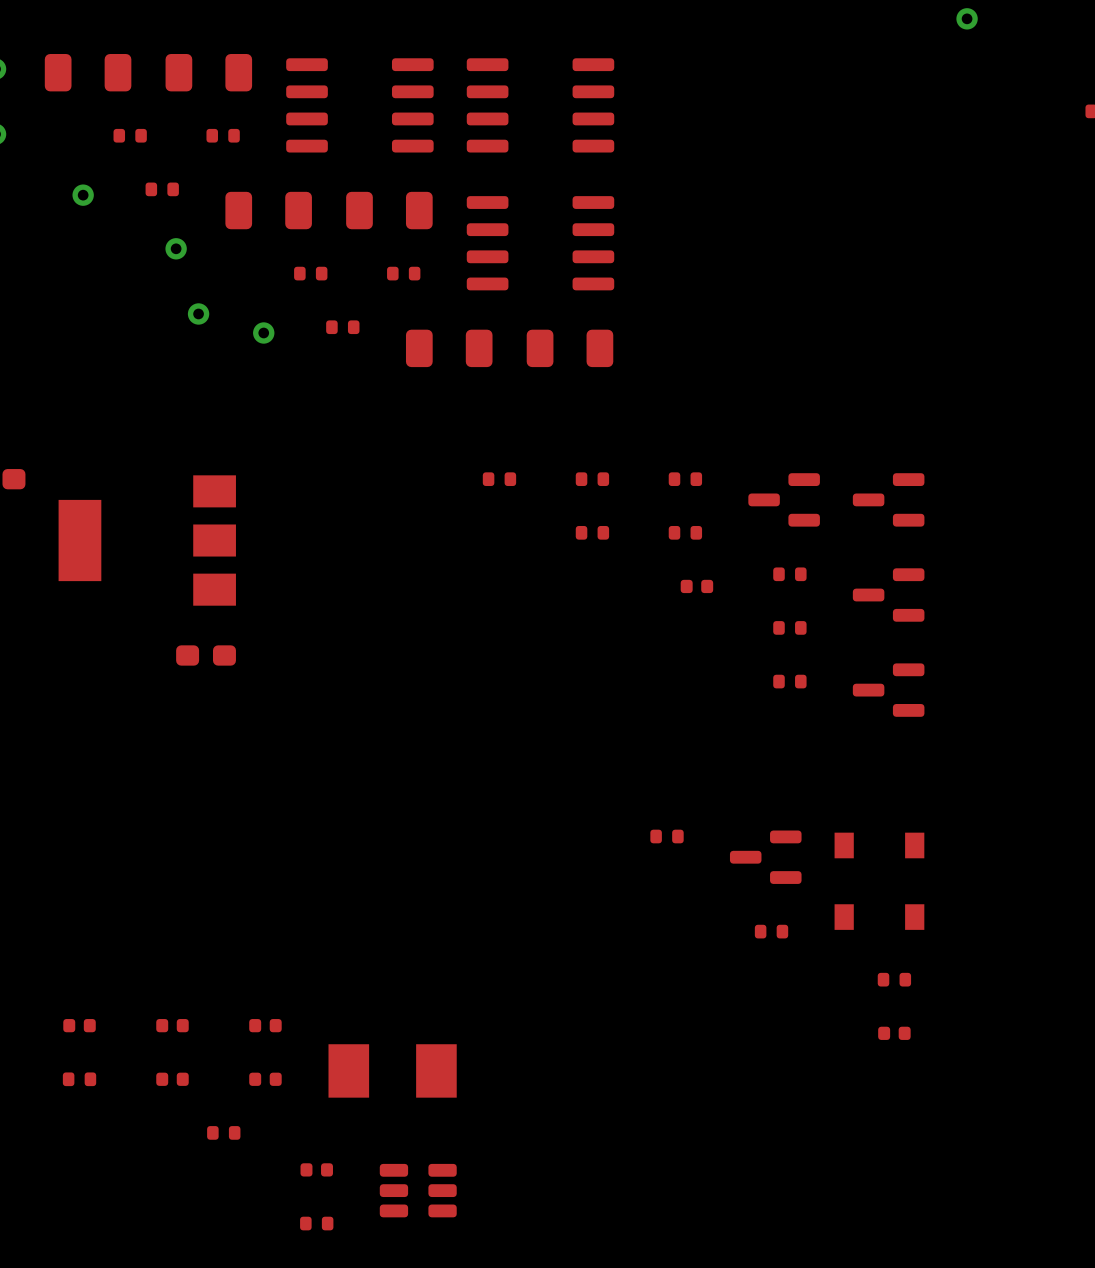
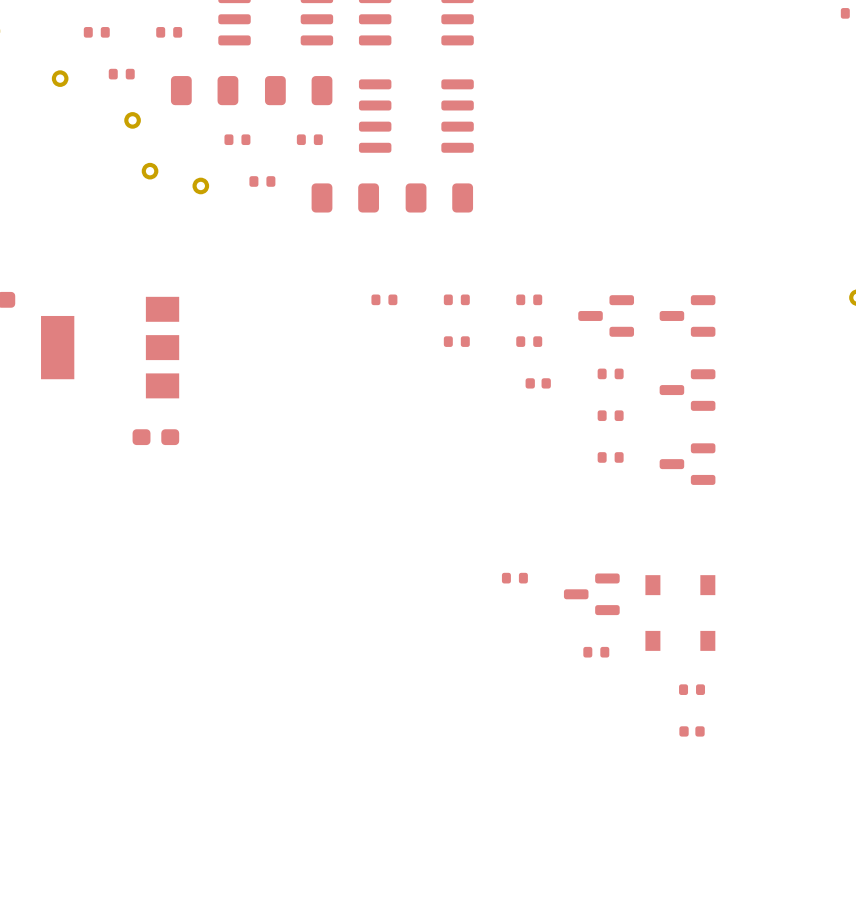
part: (79, 1025) -> none
part: (172, 1025) -> none
part: (265, 1025) -> none
part: (392, 1070) -> none
part: (79, 1079) -> none
part: (172, 1079) -> none
part: (265, 1079) -> none
part: (223, 1132) -> none
part: (316, 1169) -> none
part: (418, 1190) -> none
part: (316, 1223) -> none

